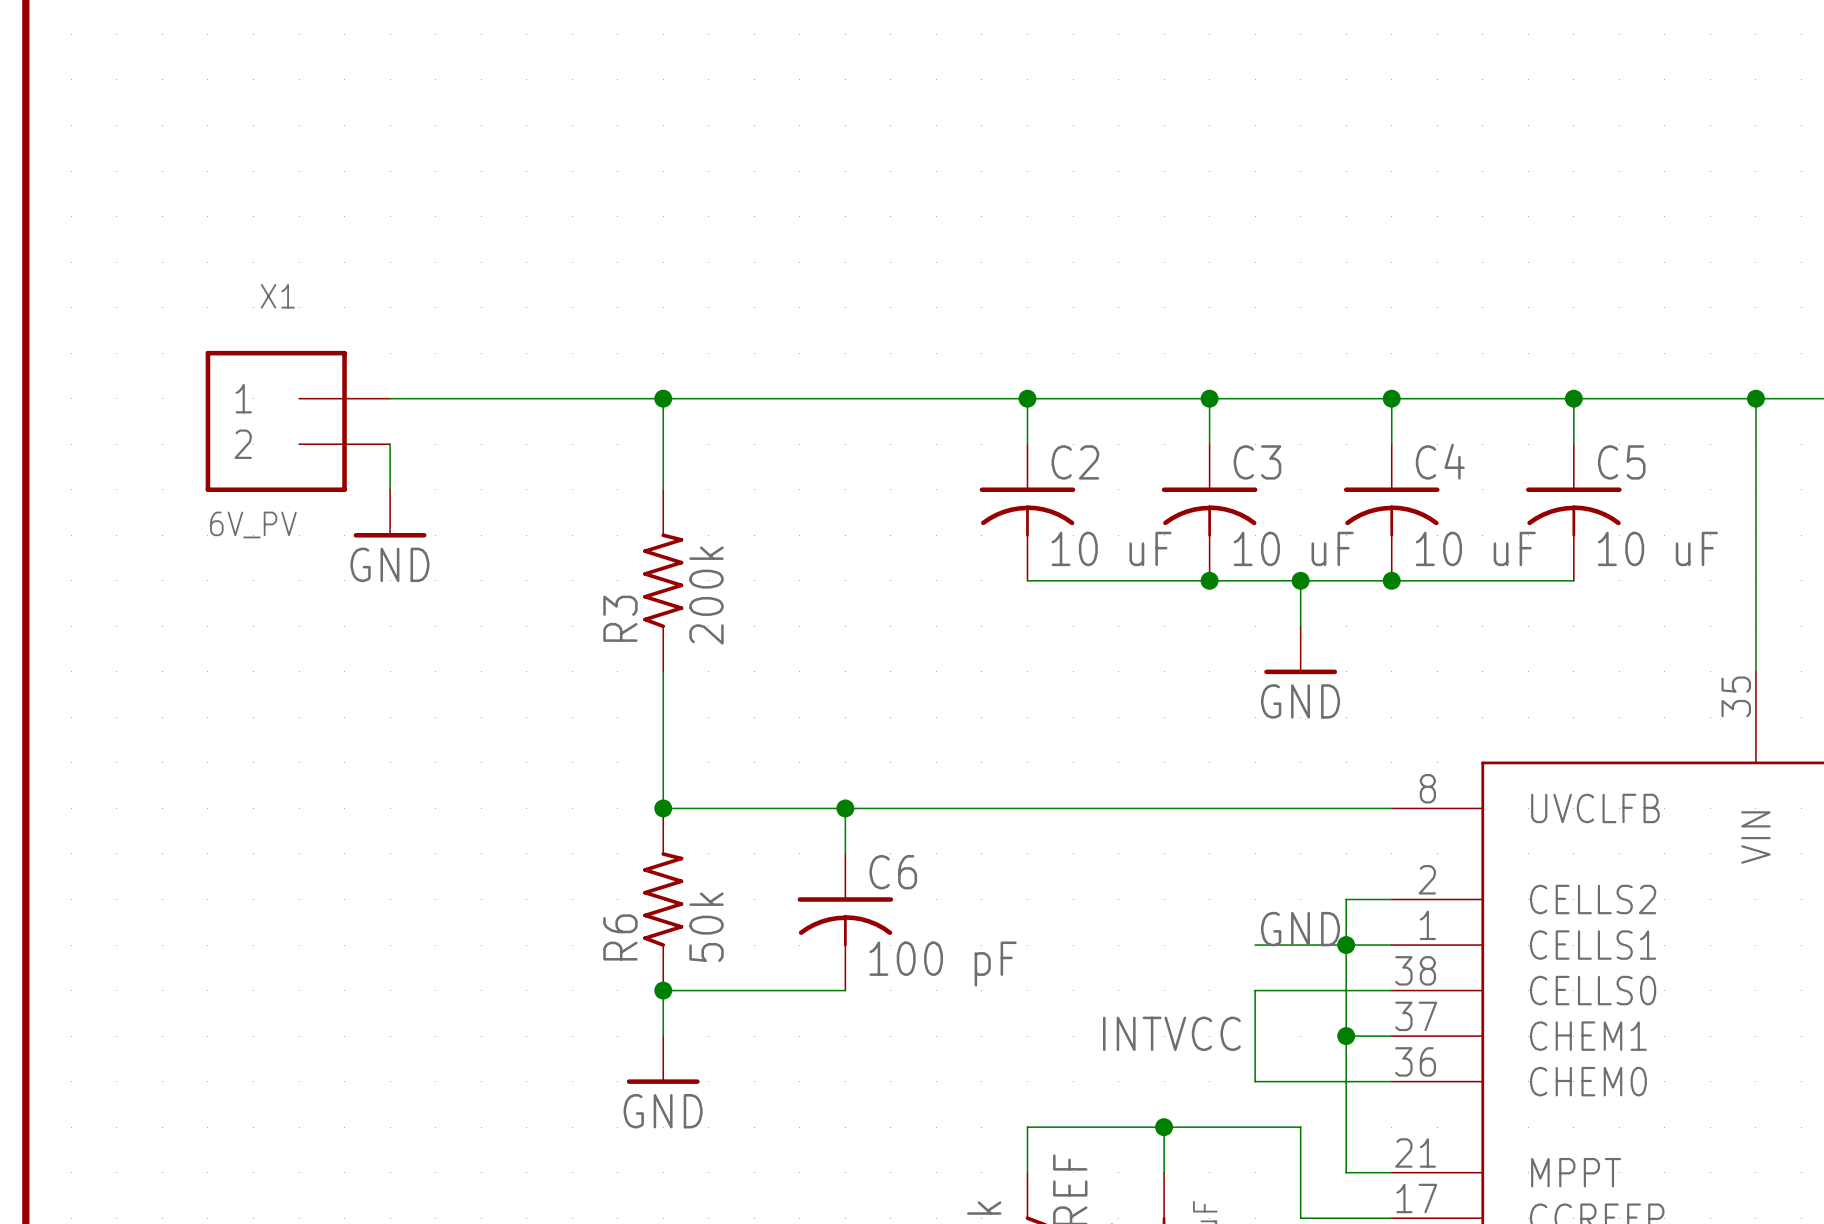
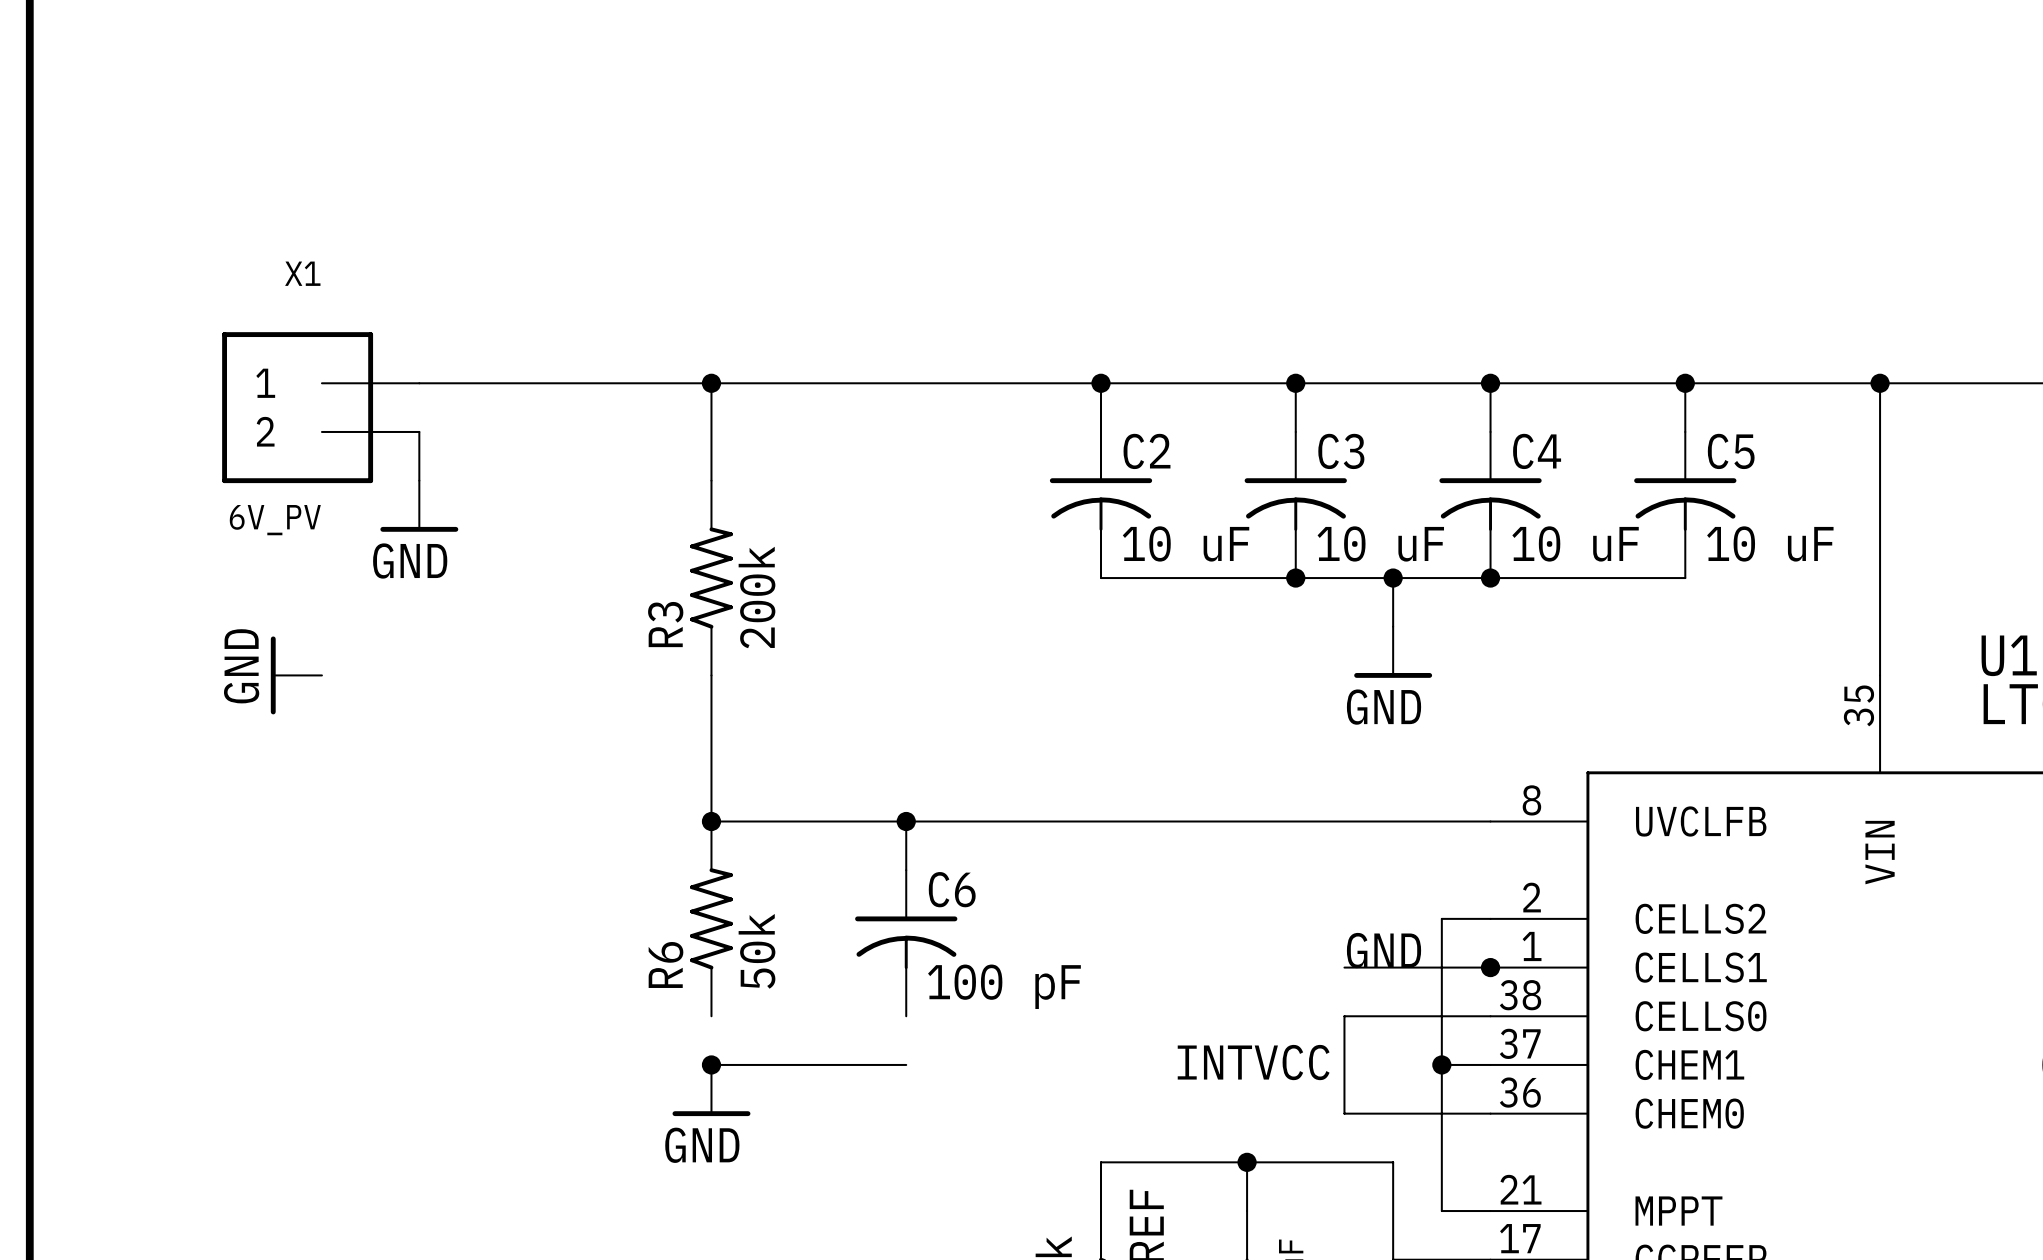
power symbol: none -> GND (296, 675)
junction position: (1346, 945) -> (1490, 967)
junction position: (663, 990) -> (711, 1064)
wire: (845, 990) (663, 990) (663, 1036) -> (906, 1064) (711, 1064)

